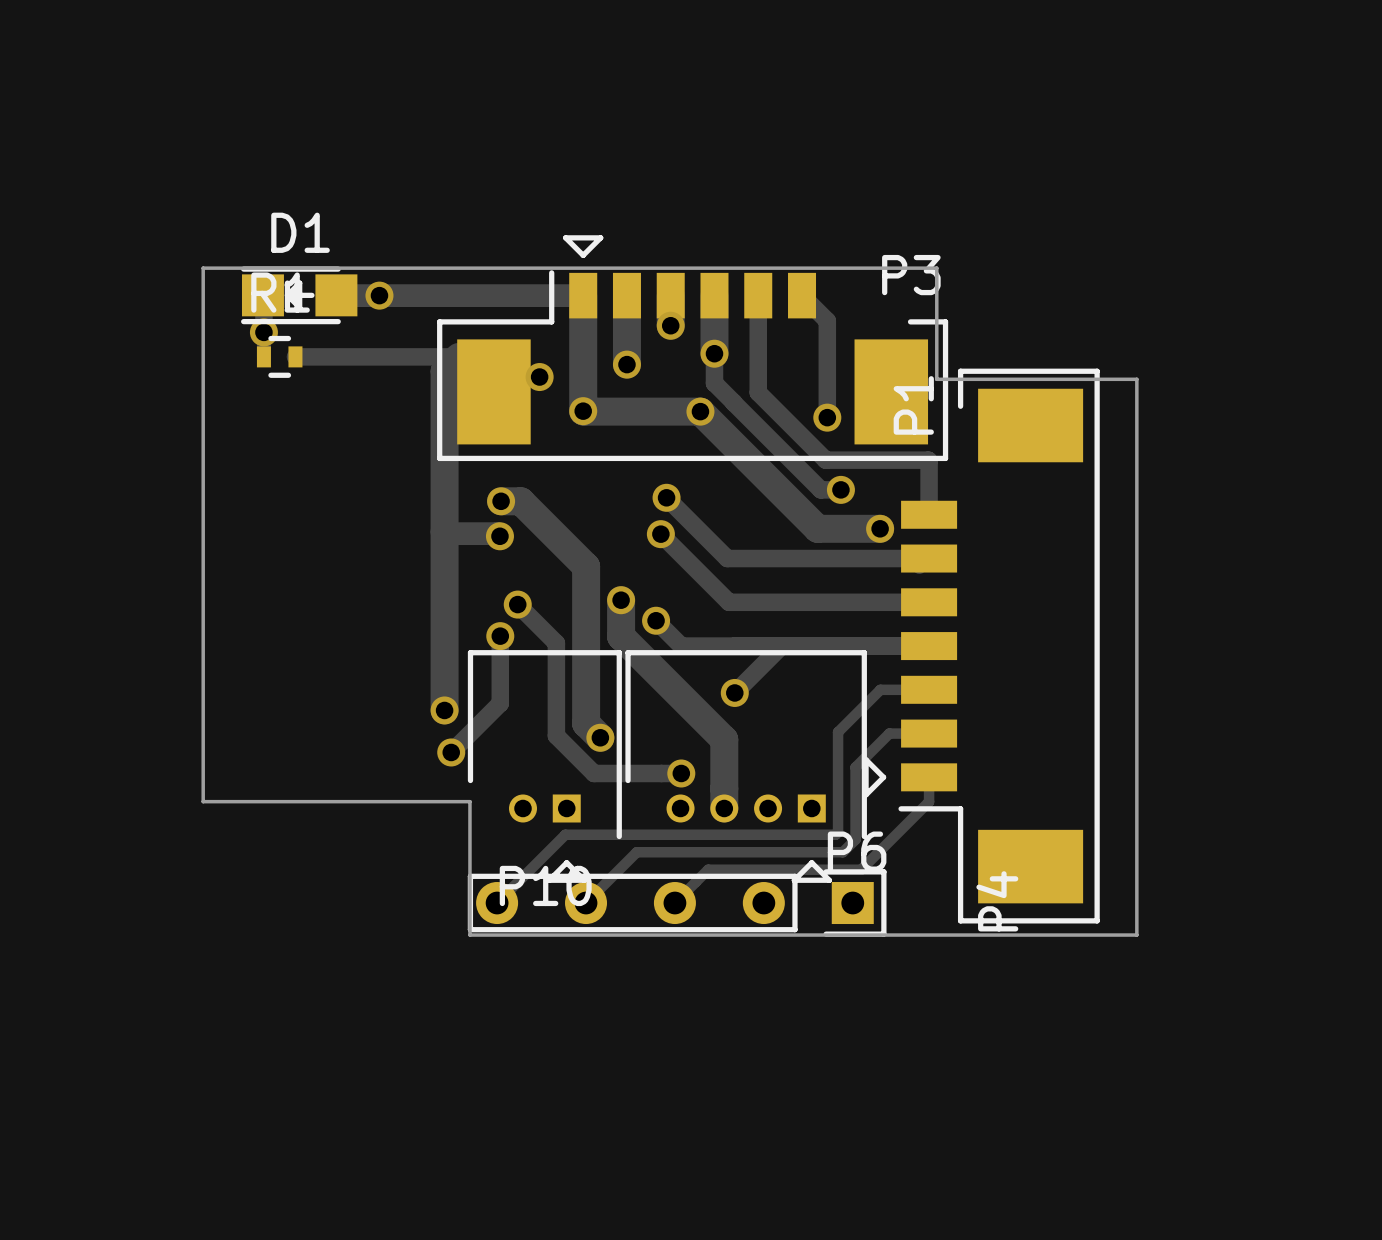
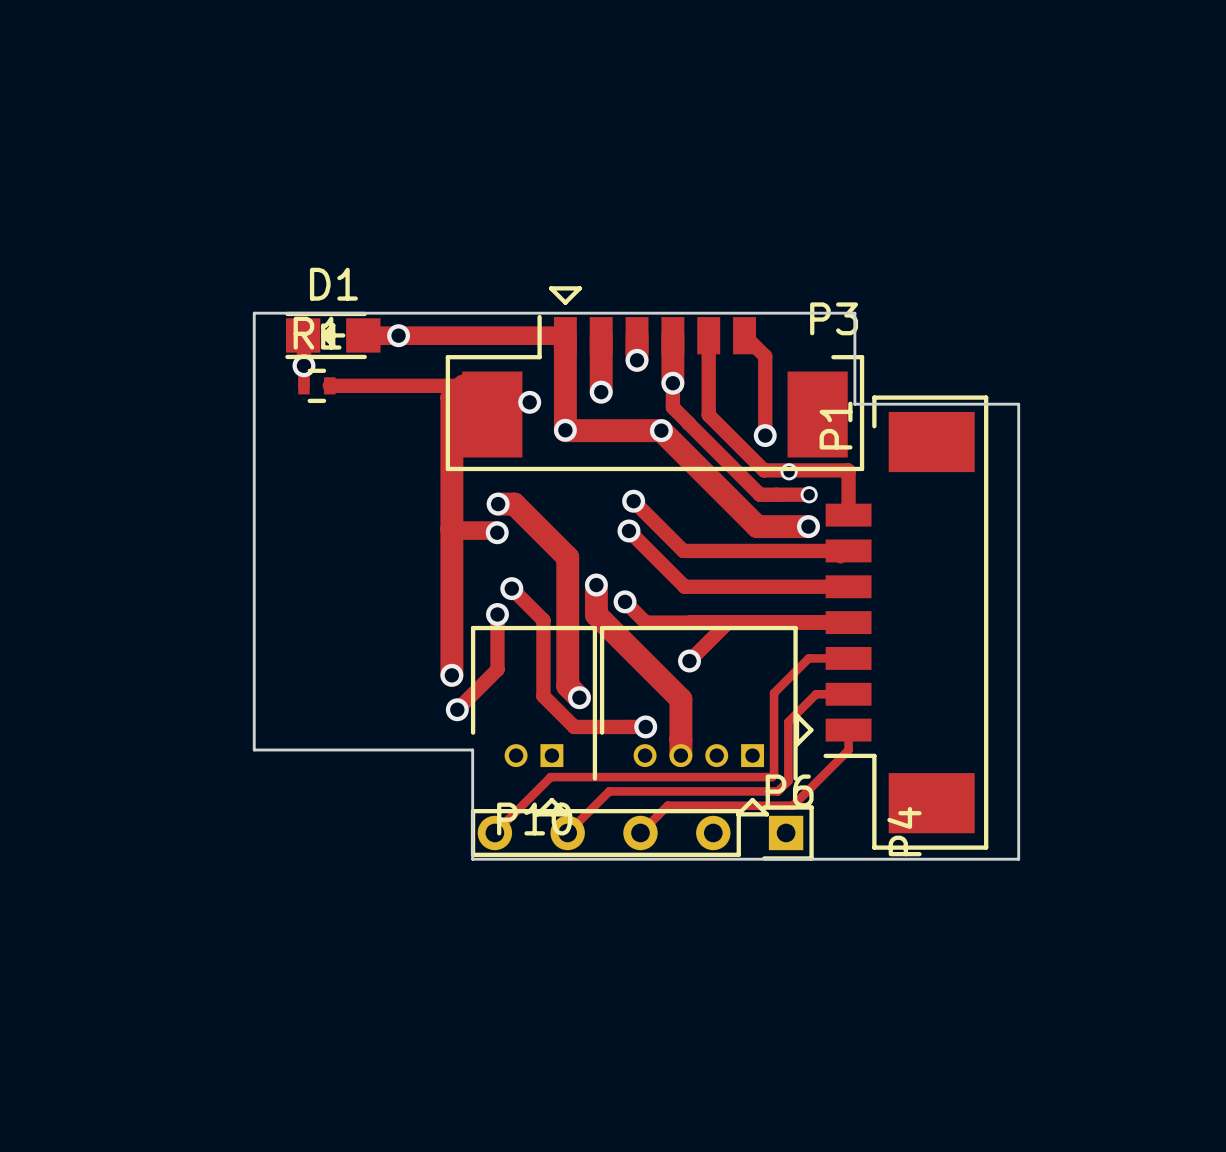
via: none -> (789, 471)
track: none -> (776, 494) (809, 494)
via: (840, 489) -> none
via: none -> (809, 494)

